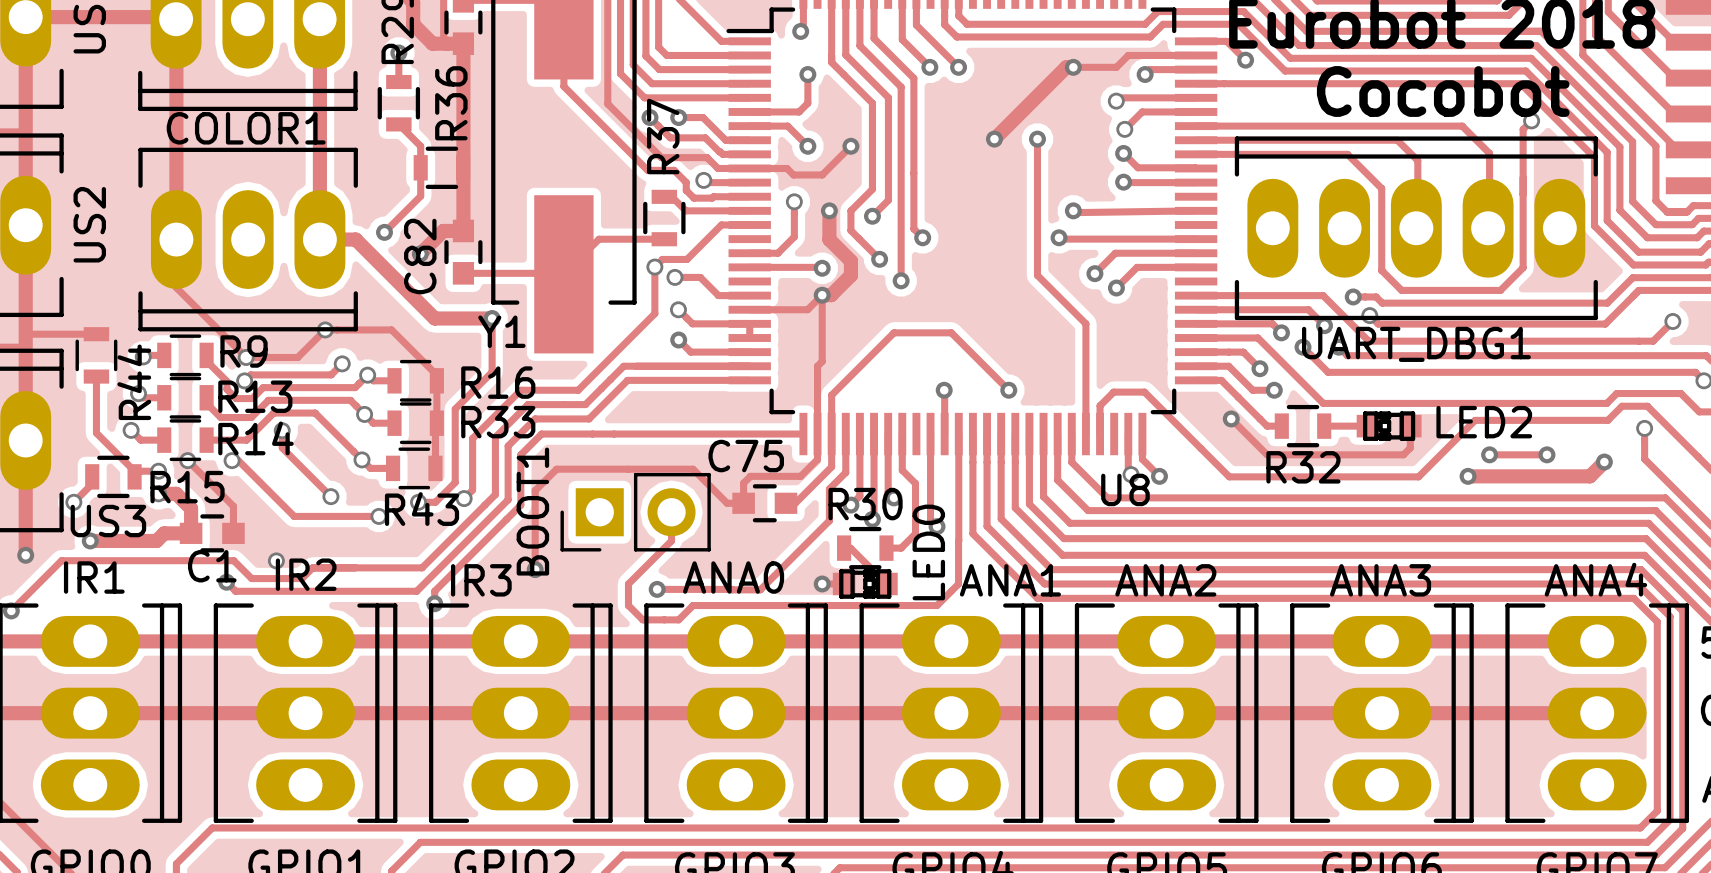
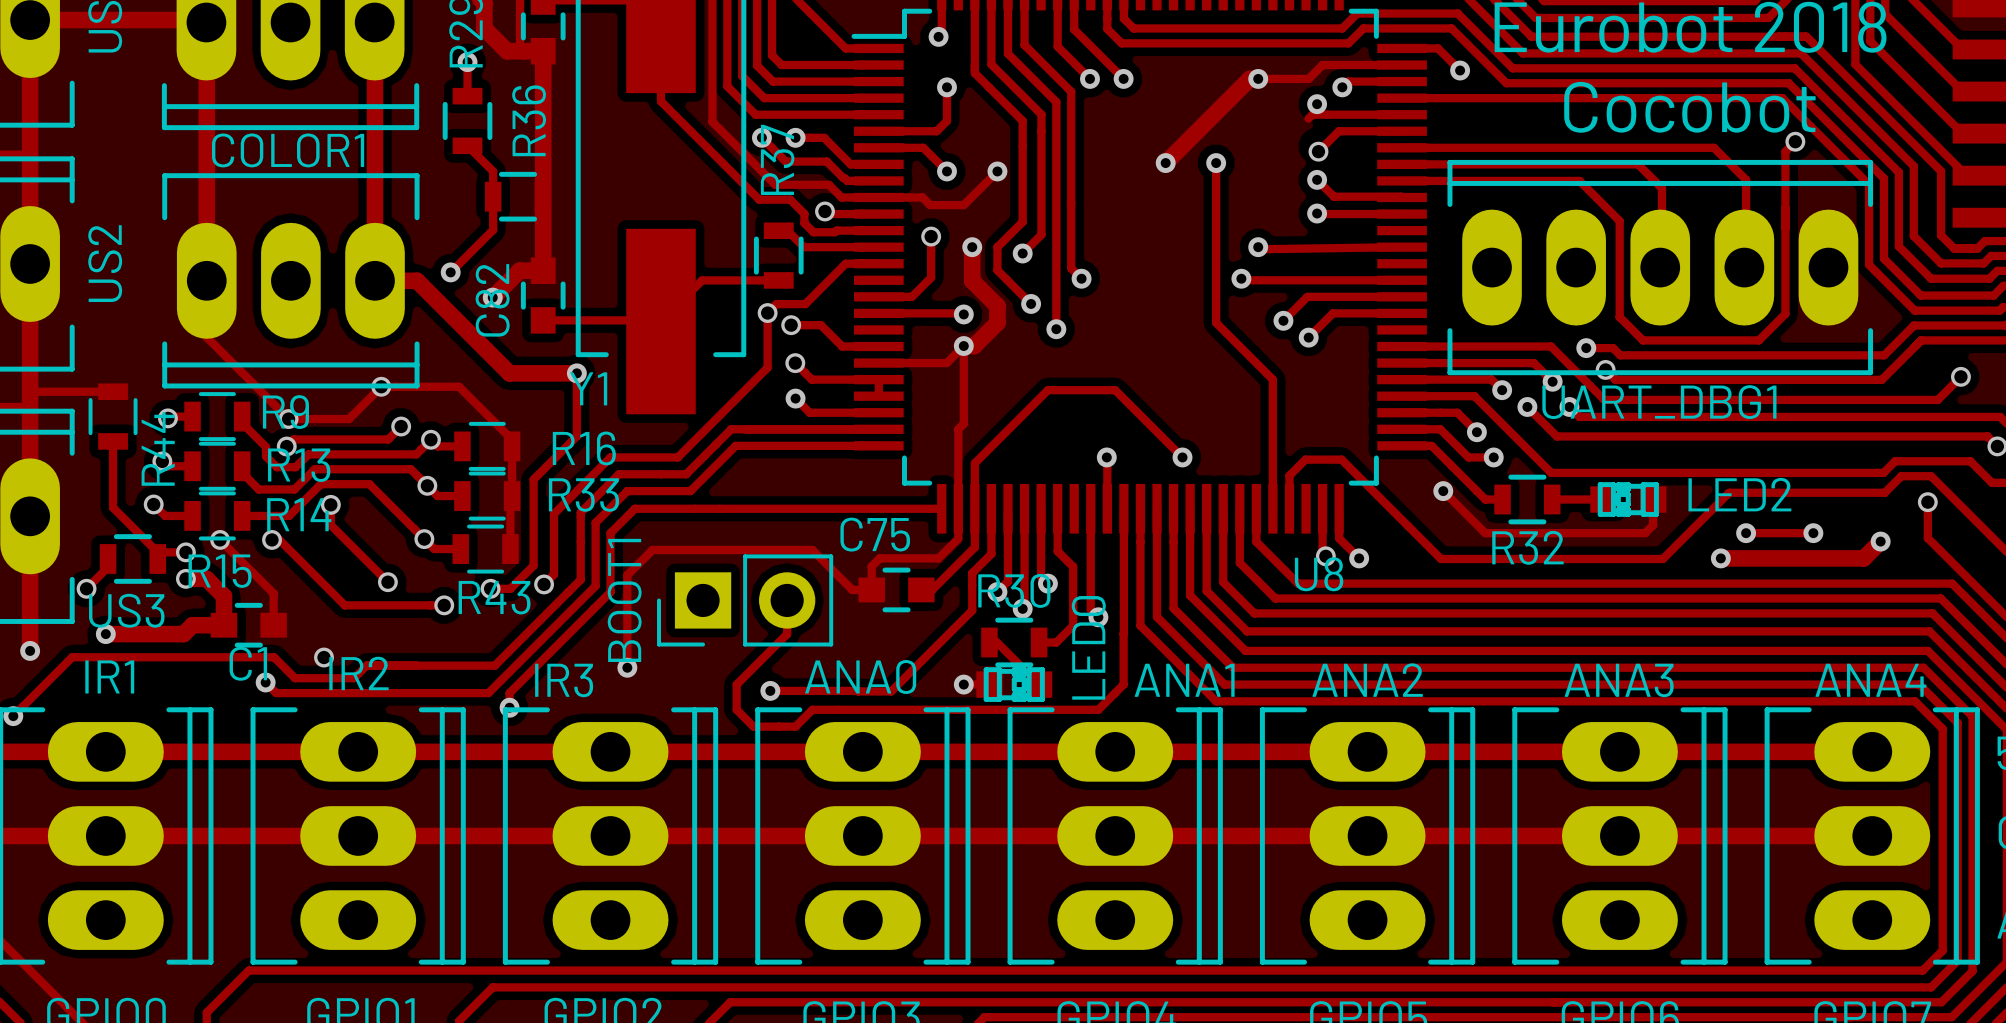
via position: (1116, 101) -> (1317, 104)

